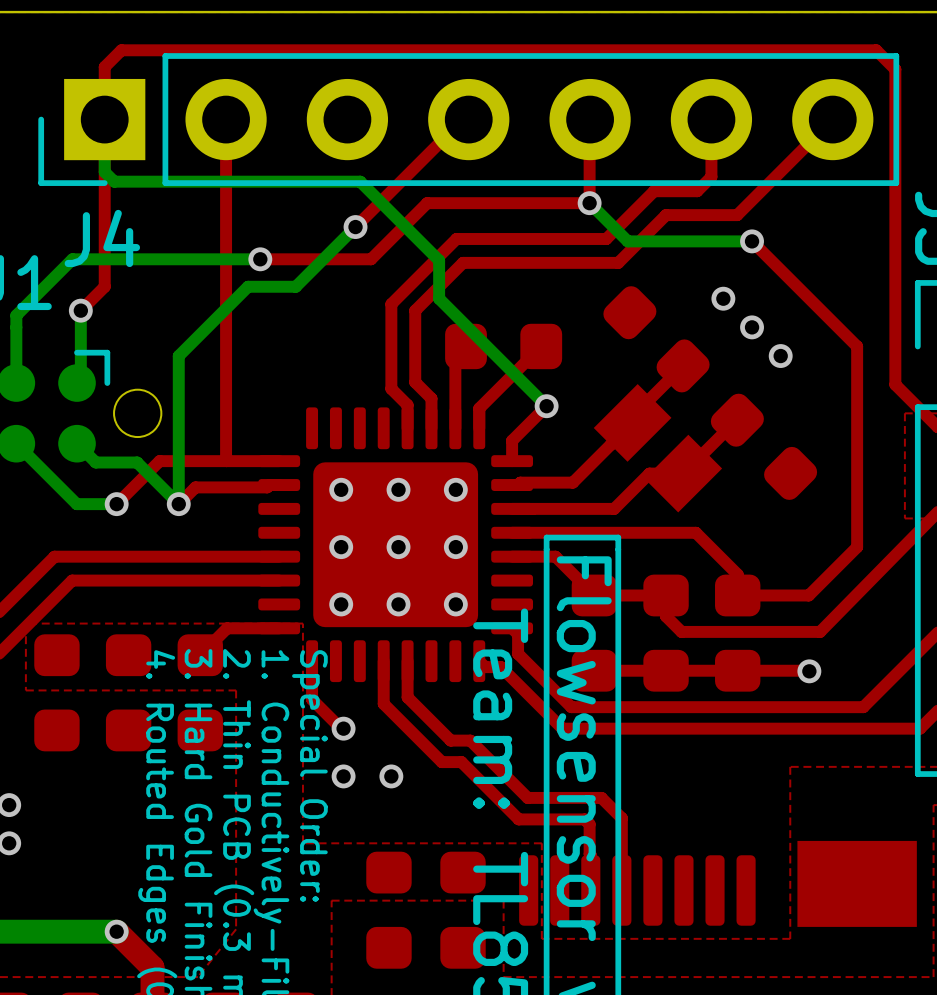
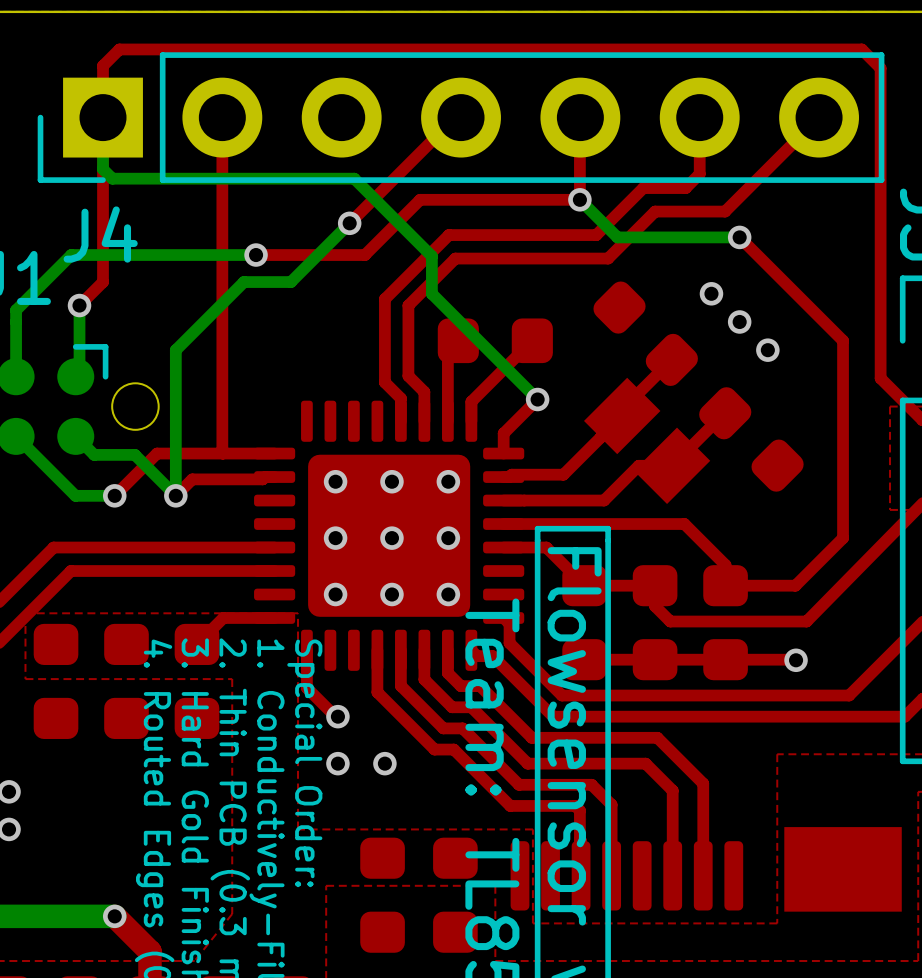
top track: none -> (424, 650) (424, 679) (452, 707) (471, 707) (527, 763) (645, 763) (672, 790) (672, 875)
top track: none -> (447, 650) (447, 673) (460, 686) (480, 686) (531, 737) (657, 737) (703, 783) (703, 875)

